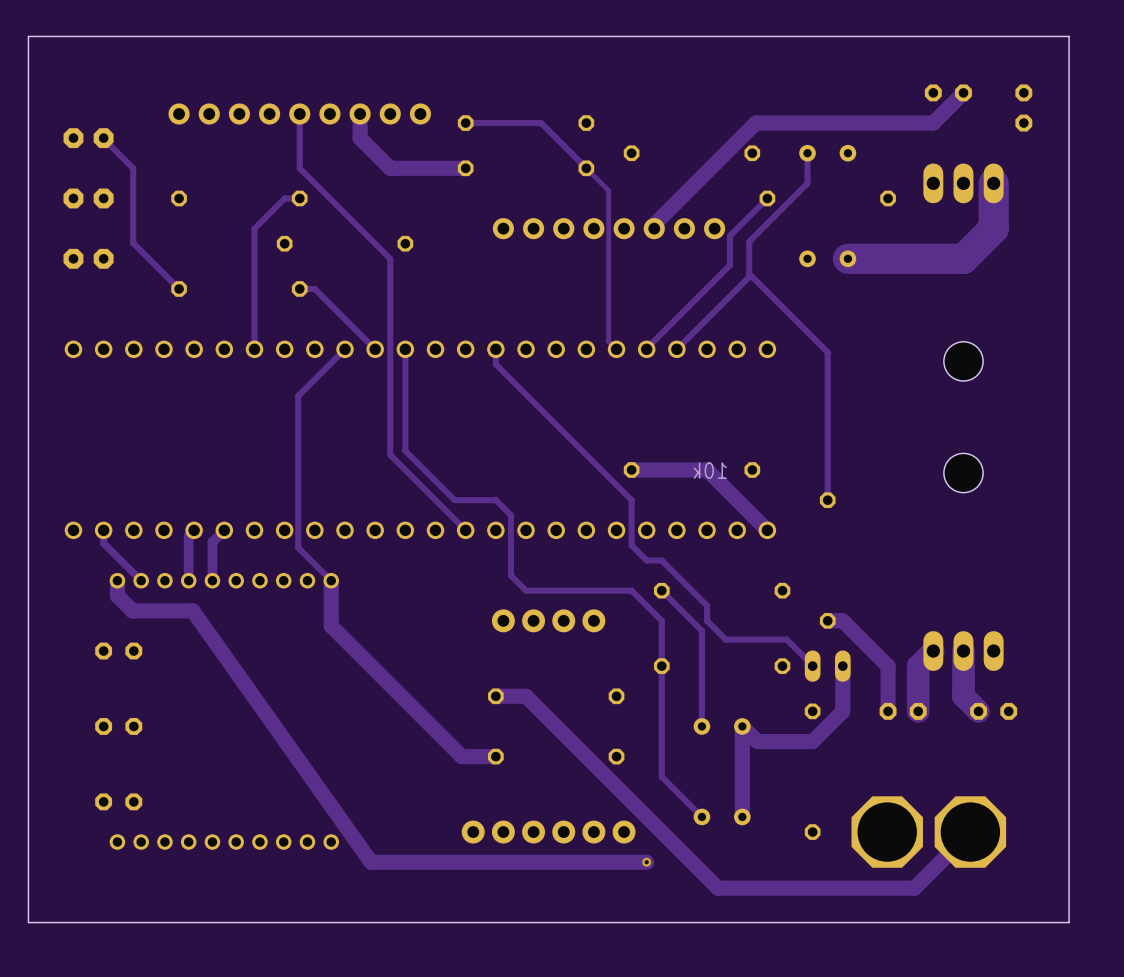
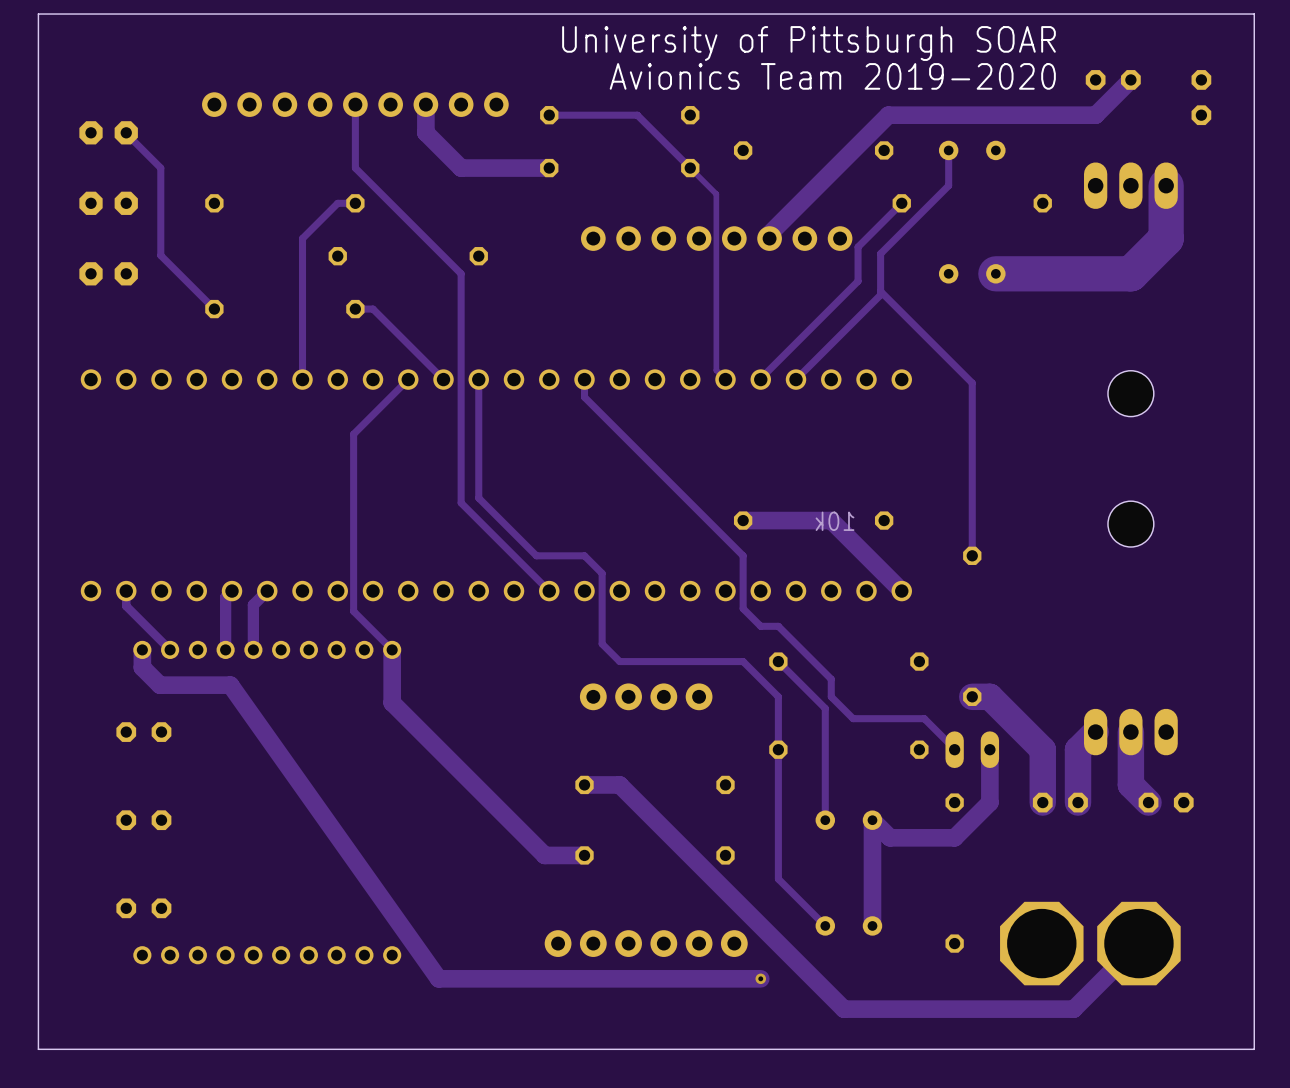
text: none -> University of Pittsburgh SOAR (808, 43)
text: none -> Avionics Team 2019-2020 (832, 76)
track width: thin (827, 620) (842, 620) (888, 666) (888, 711) -> thick (972, 696) (989, 696) (1042, 749) (1042, 802)

